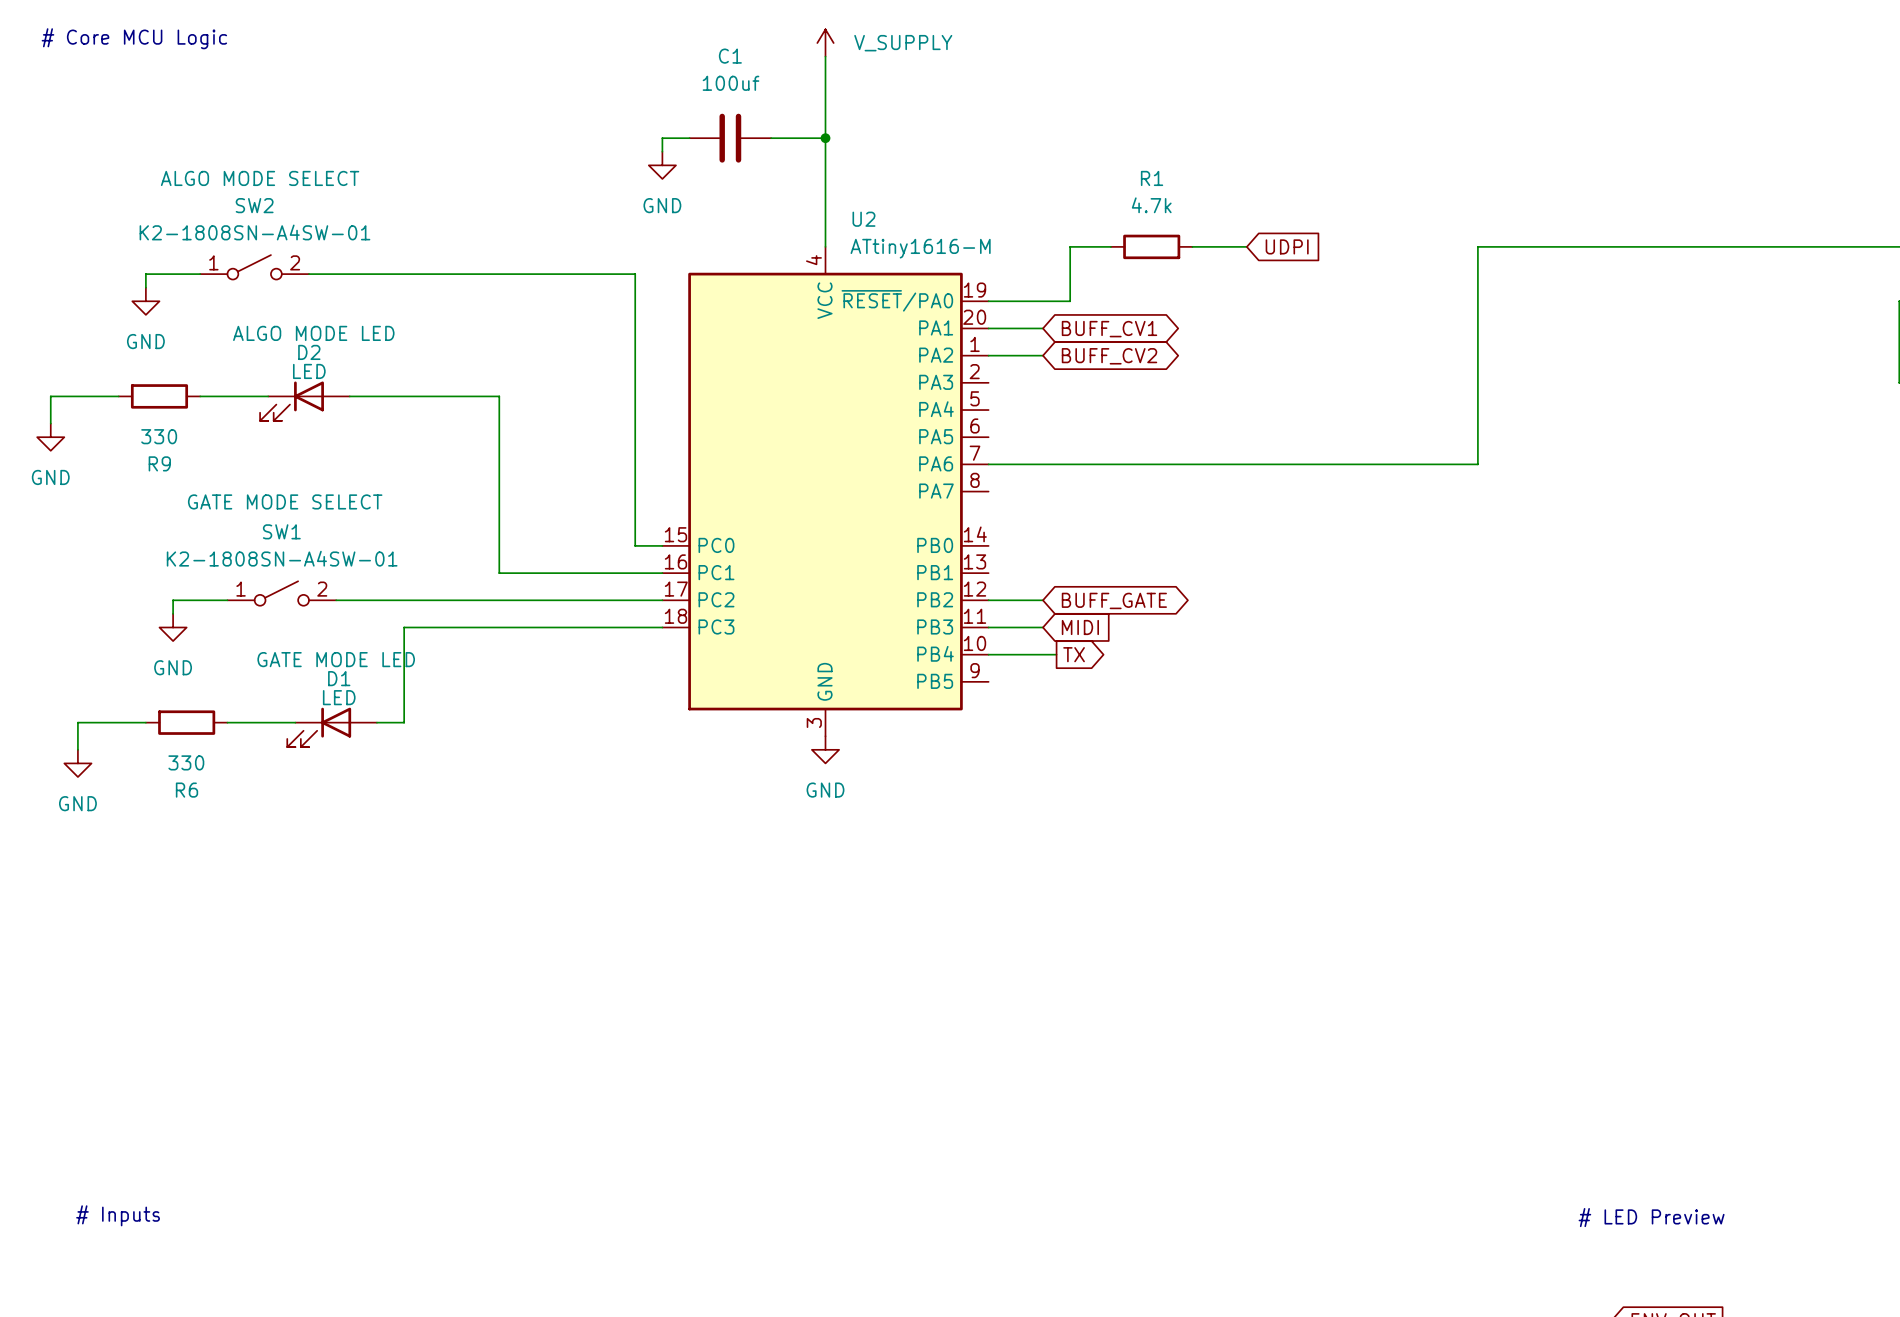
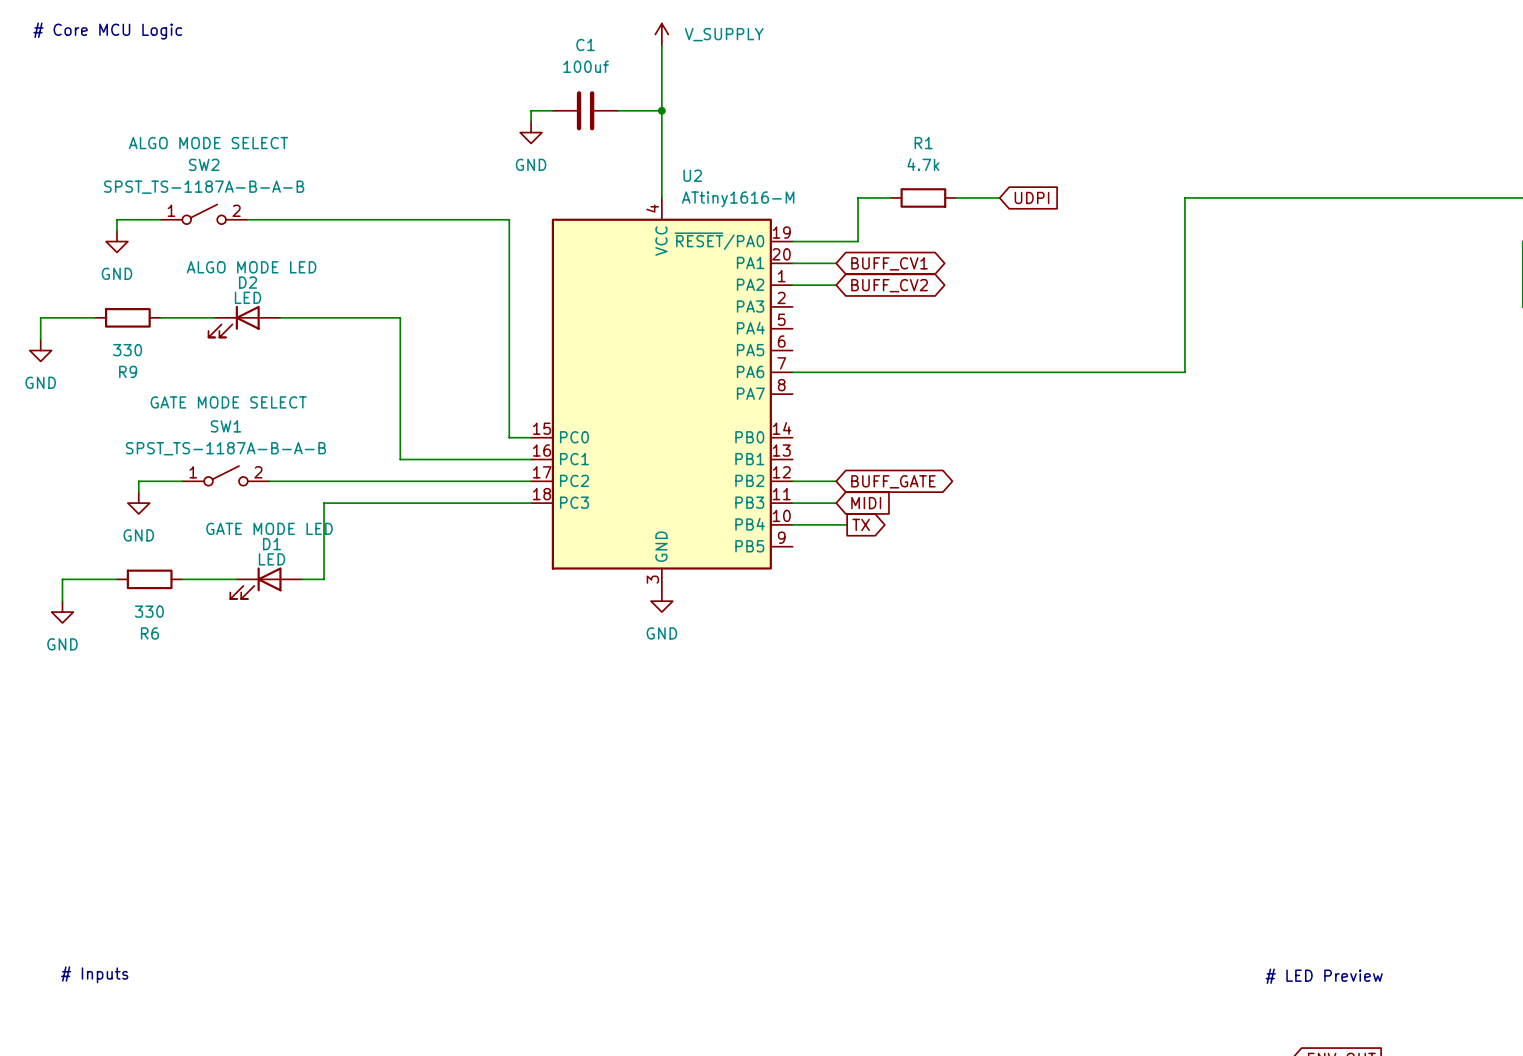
SW2 value: K2-1808SN-A4SW-01 (254, 232) -> SPST_TS-1187A-B-A-B (204, 187)
SW1 value: K2-1808SN-A4SW-01 (282, 558) -> SPST_TS-1187A-B-A-B (225, 448)

